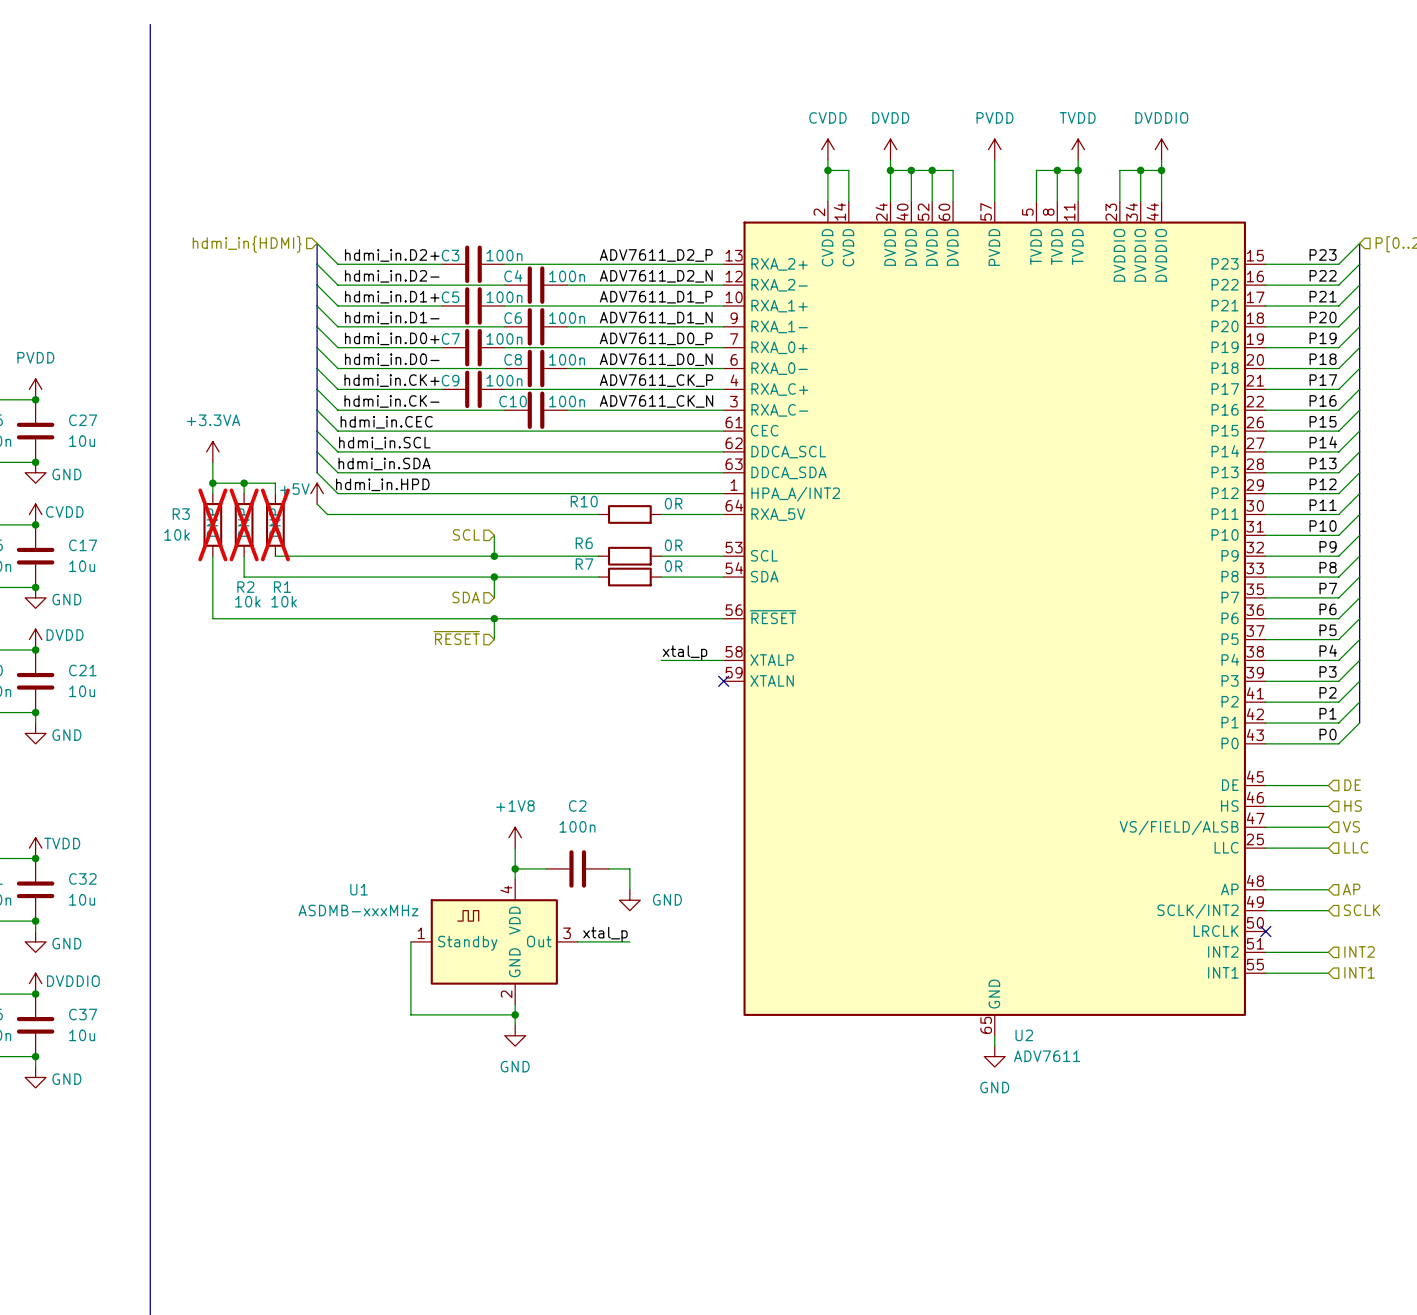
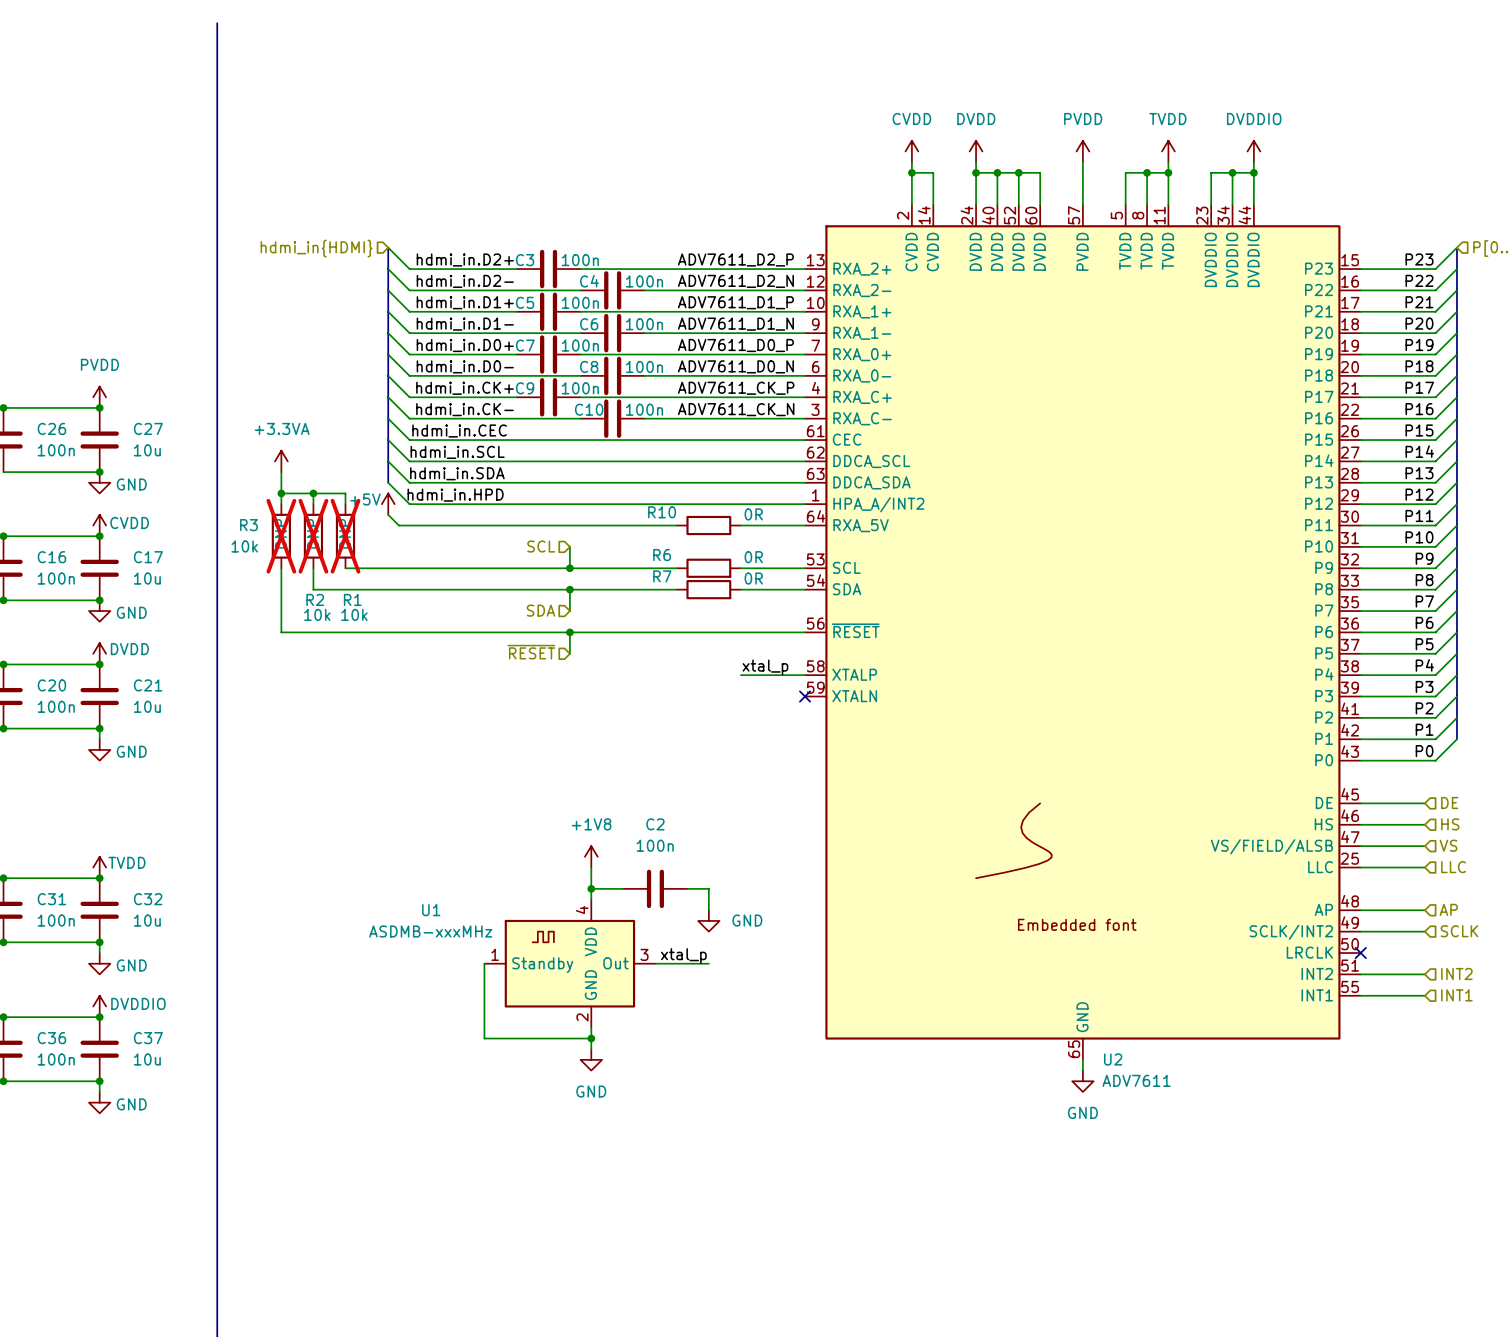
U2 symbol: [723, 201, 1266, 1036] -> [805, 204, 1361, 1060]

